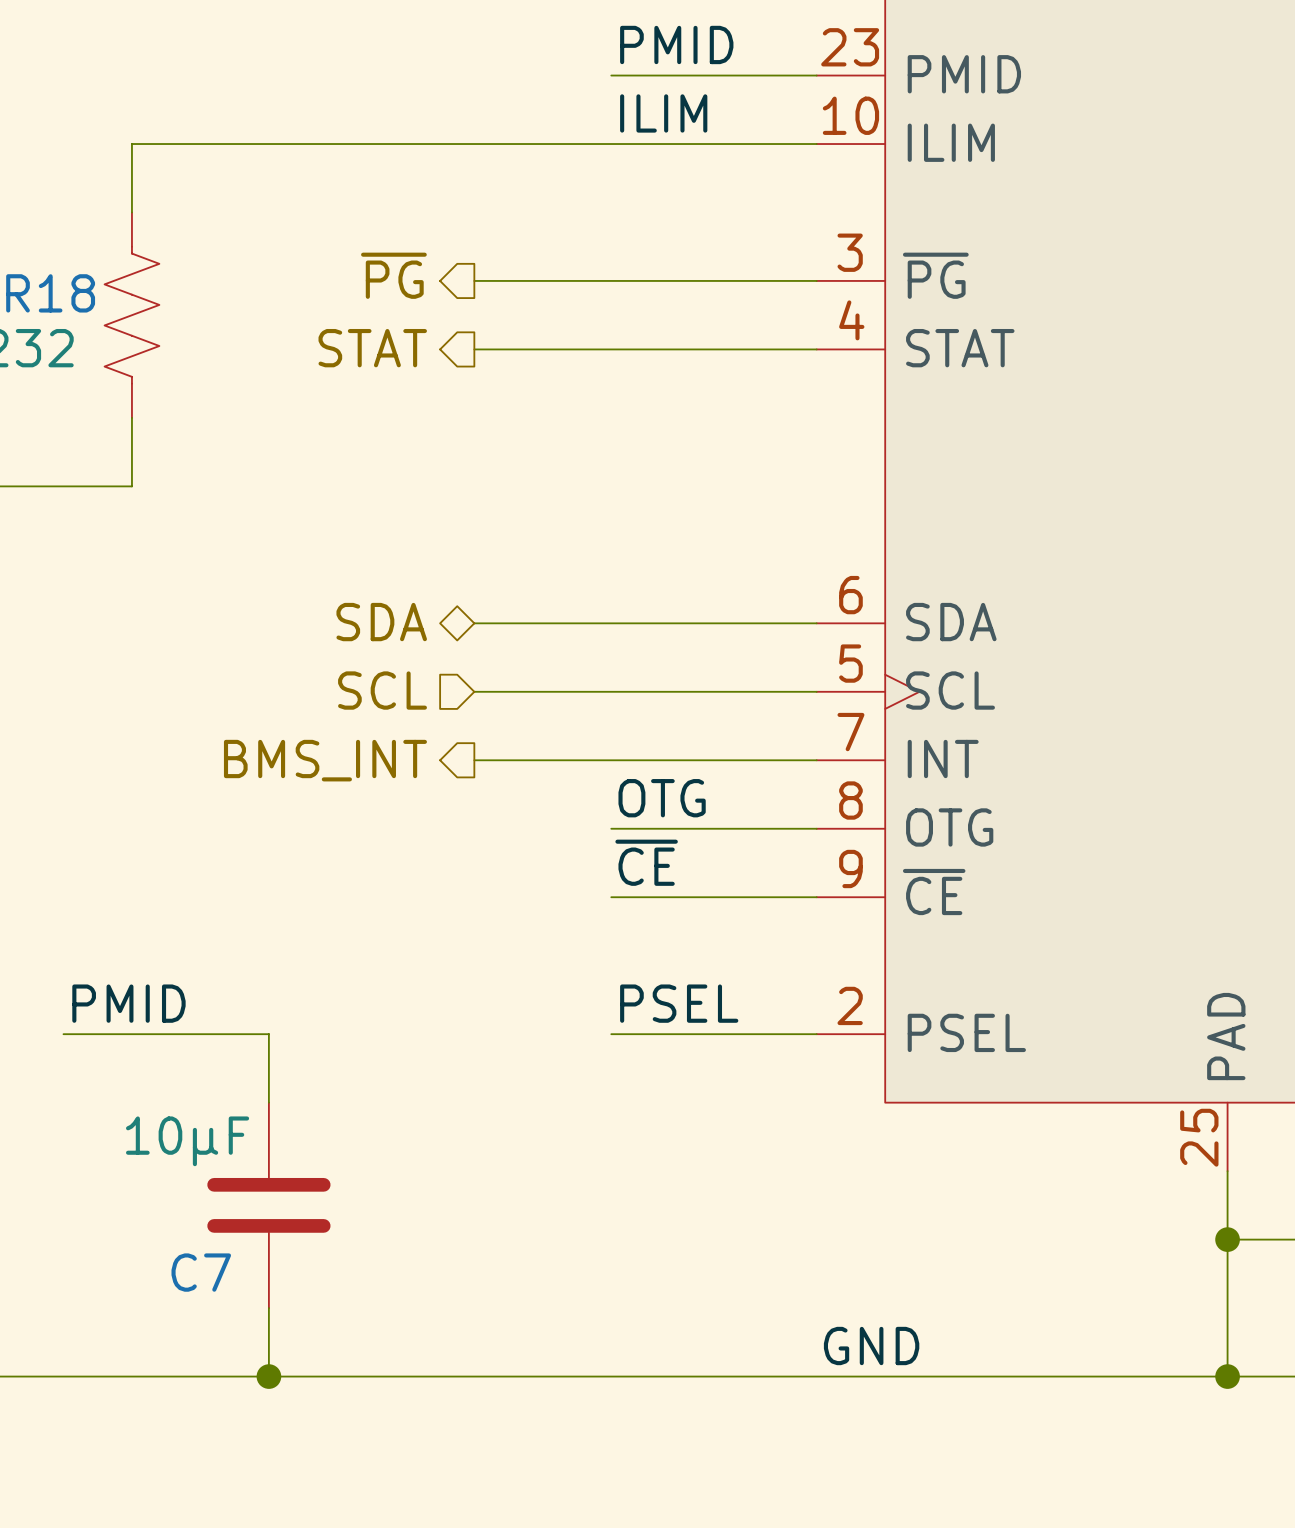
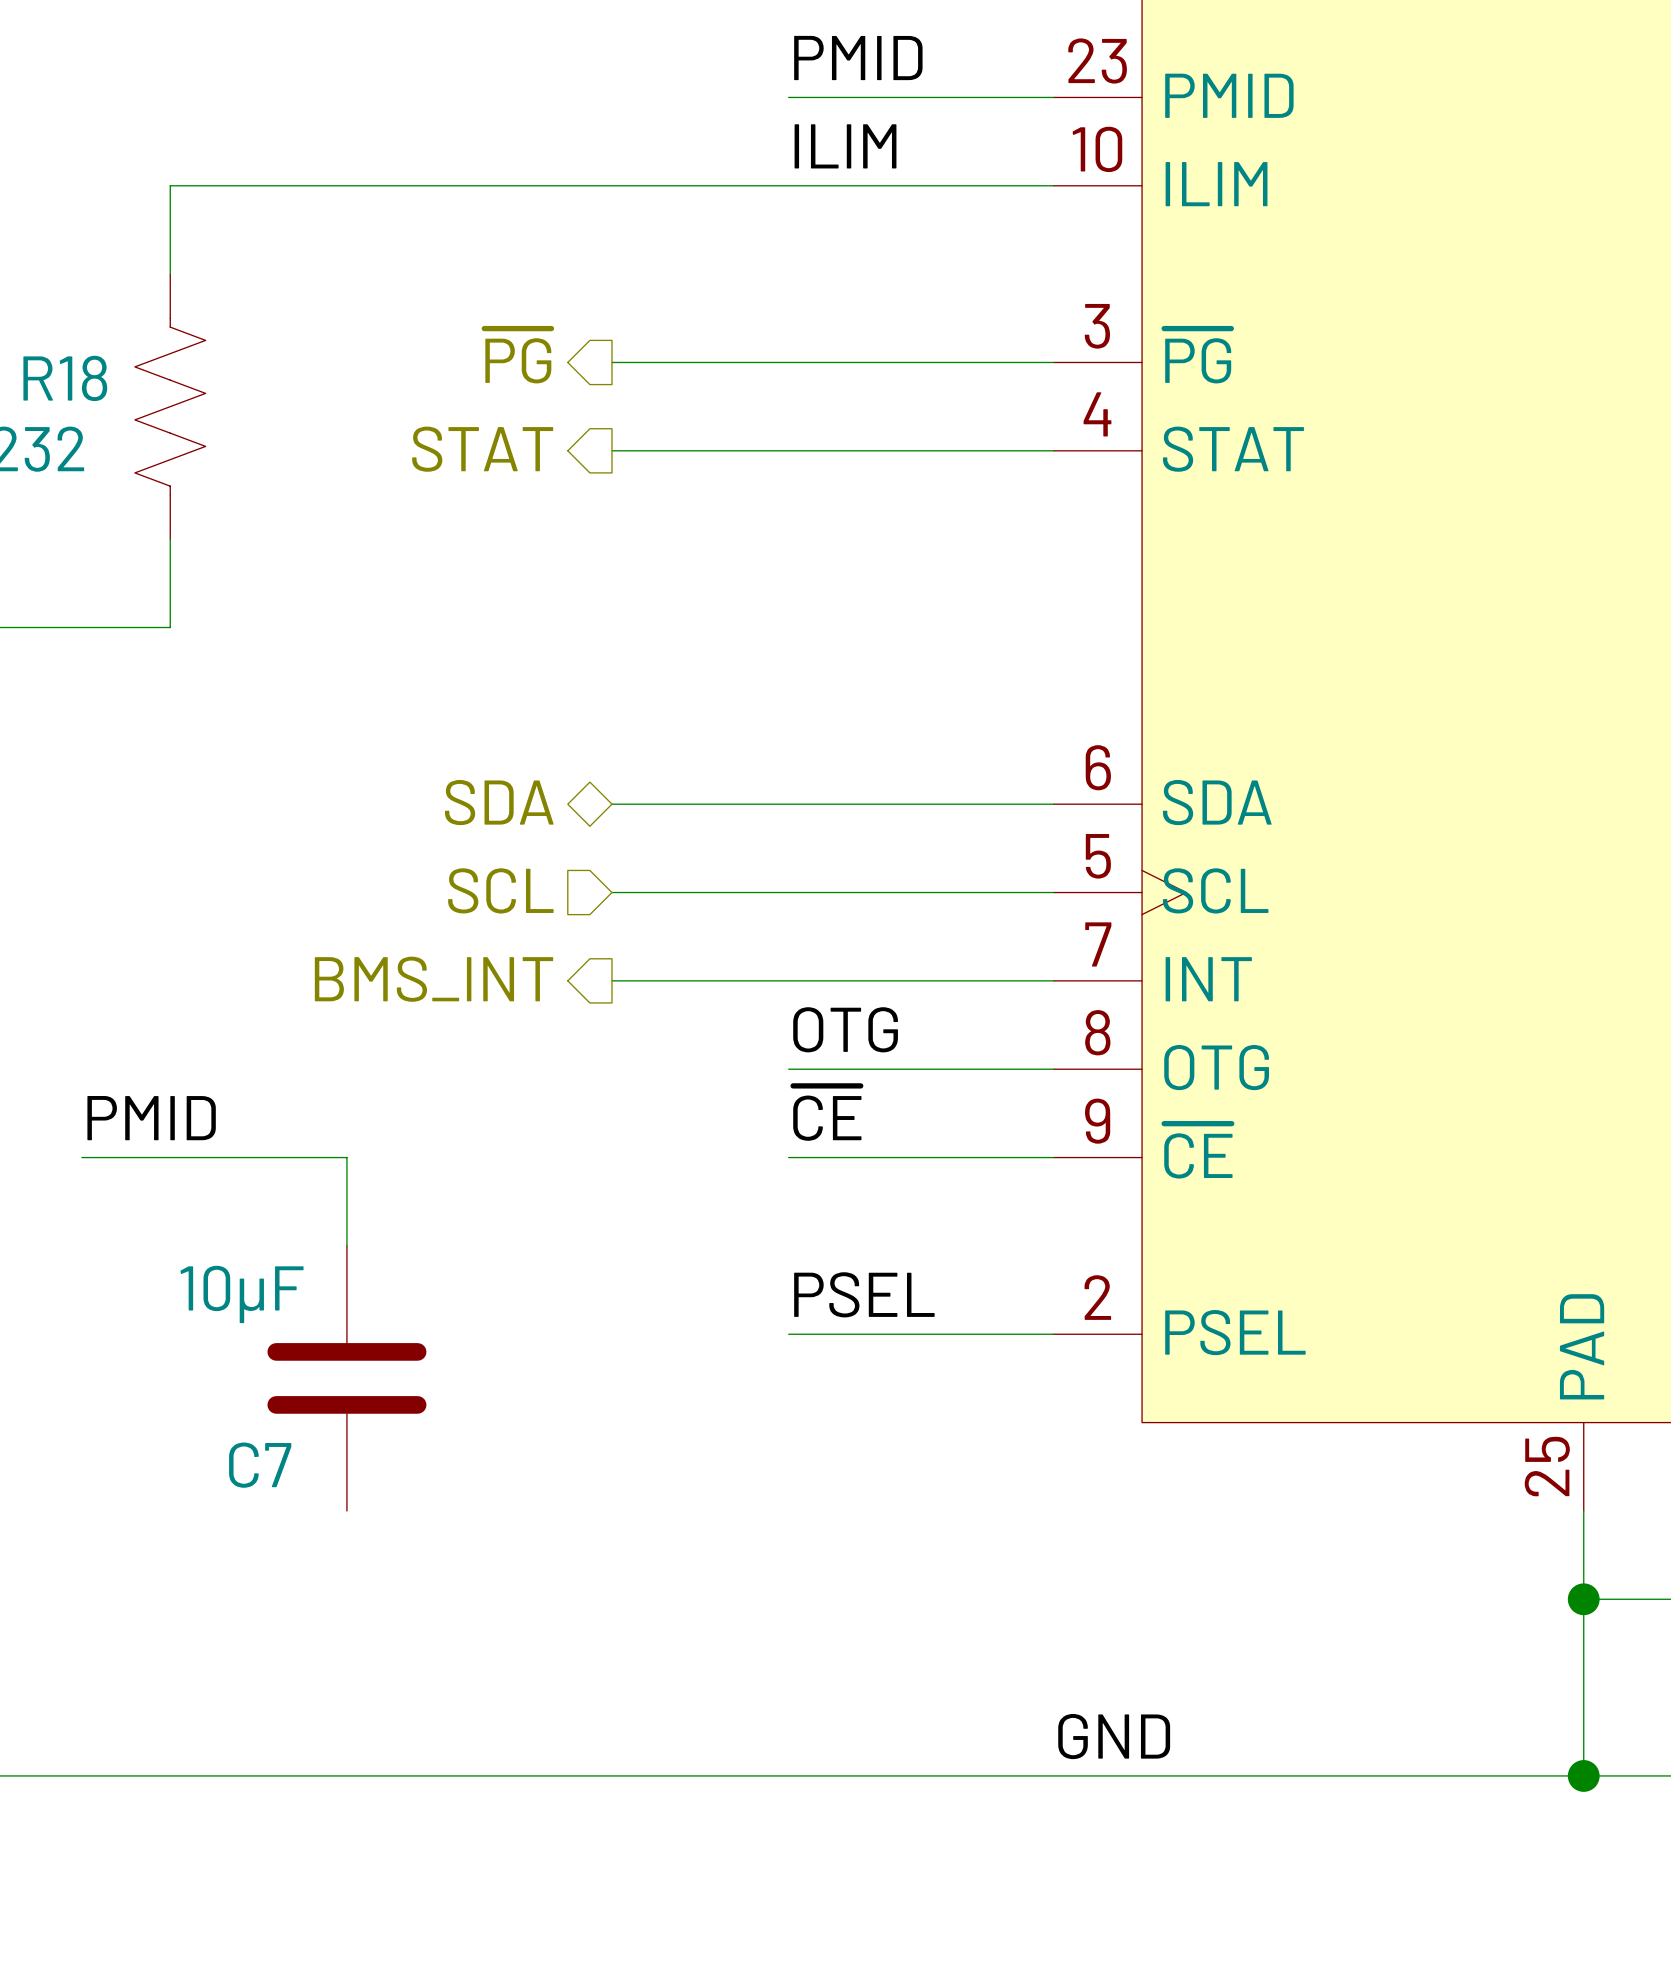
label position: PMID (128, 1003) -> PMID (151, 1118)
wire: (63, 1034) (268, 1034) (268, 1102) -> (81, 1157) (346, 1157) (346, 1245)
C7 position: (268, 1205) -> (346, 1378)
wire: (268, 1308) (268, 1376) -> none
junction: (268, 1376) -> none

